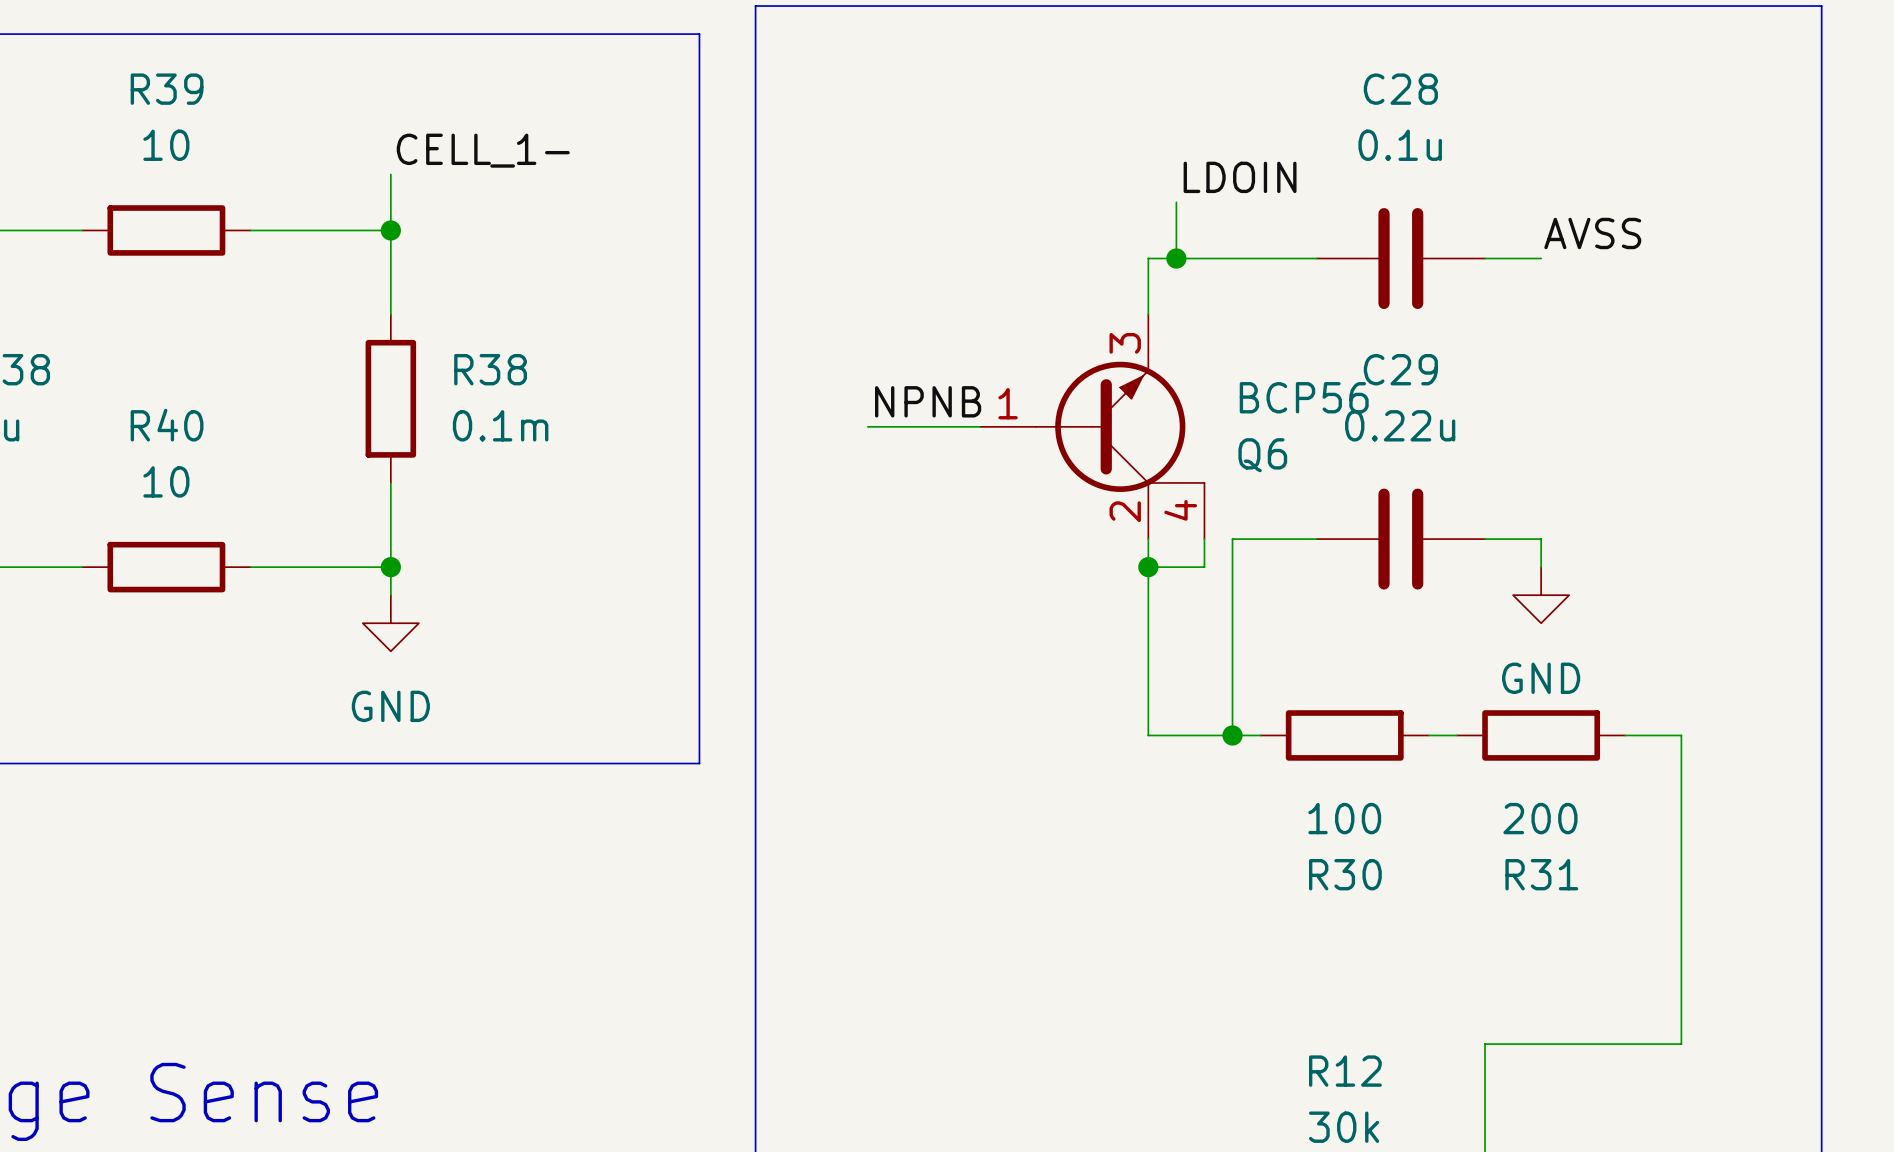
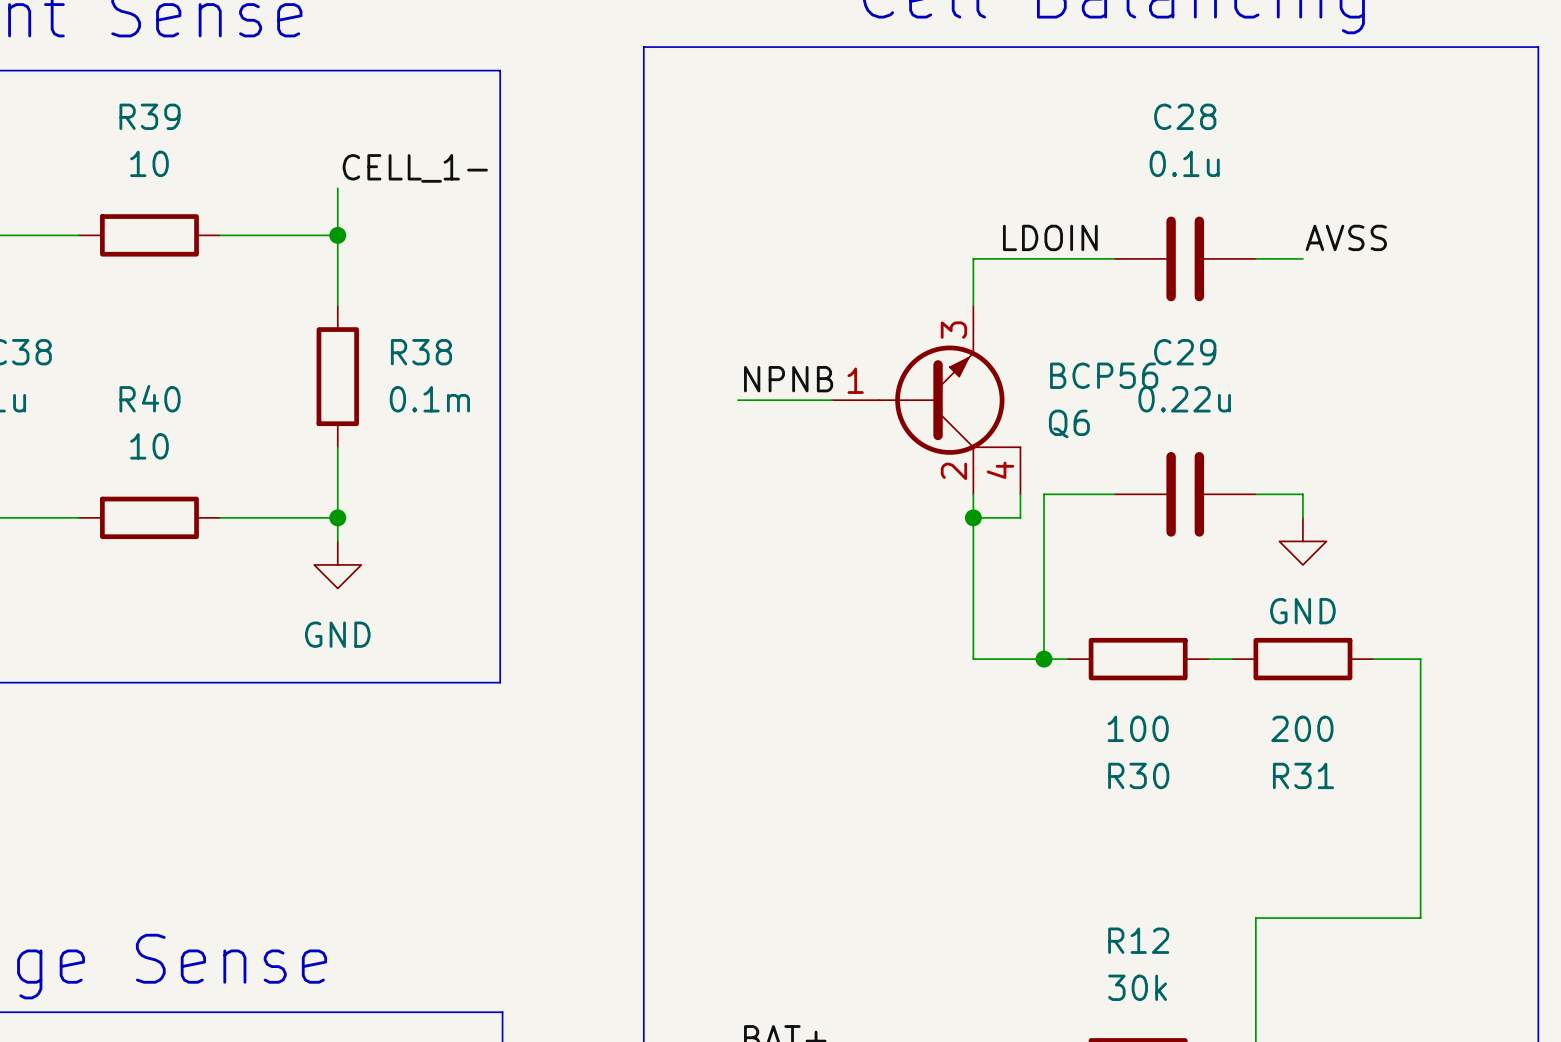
line: (584, 34) (699, 34) (699, 763) (584, 763) -> (500, 70) (500, 682)
label position: LDOIN (1240, 177) -> LDOIN (1050, 237)
wire: (1176, 202) (1176, 258) -> none
junction: (1176, 258) -> none

